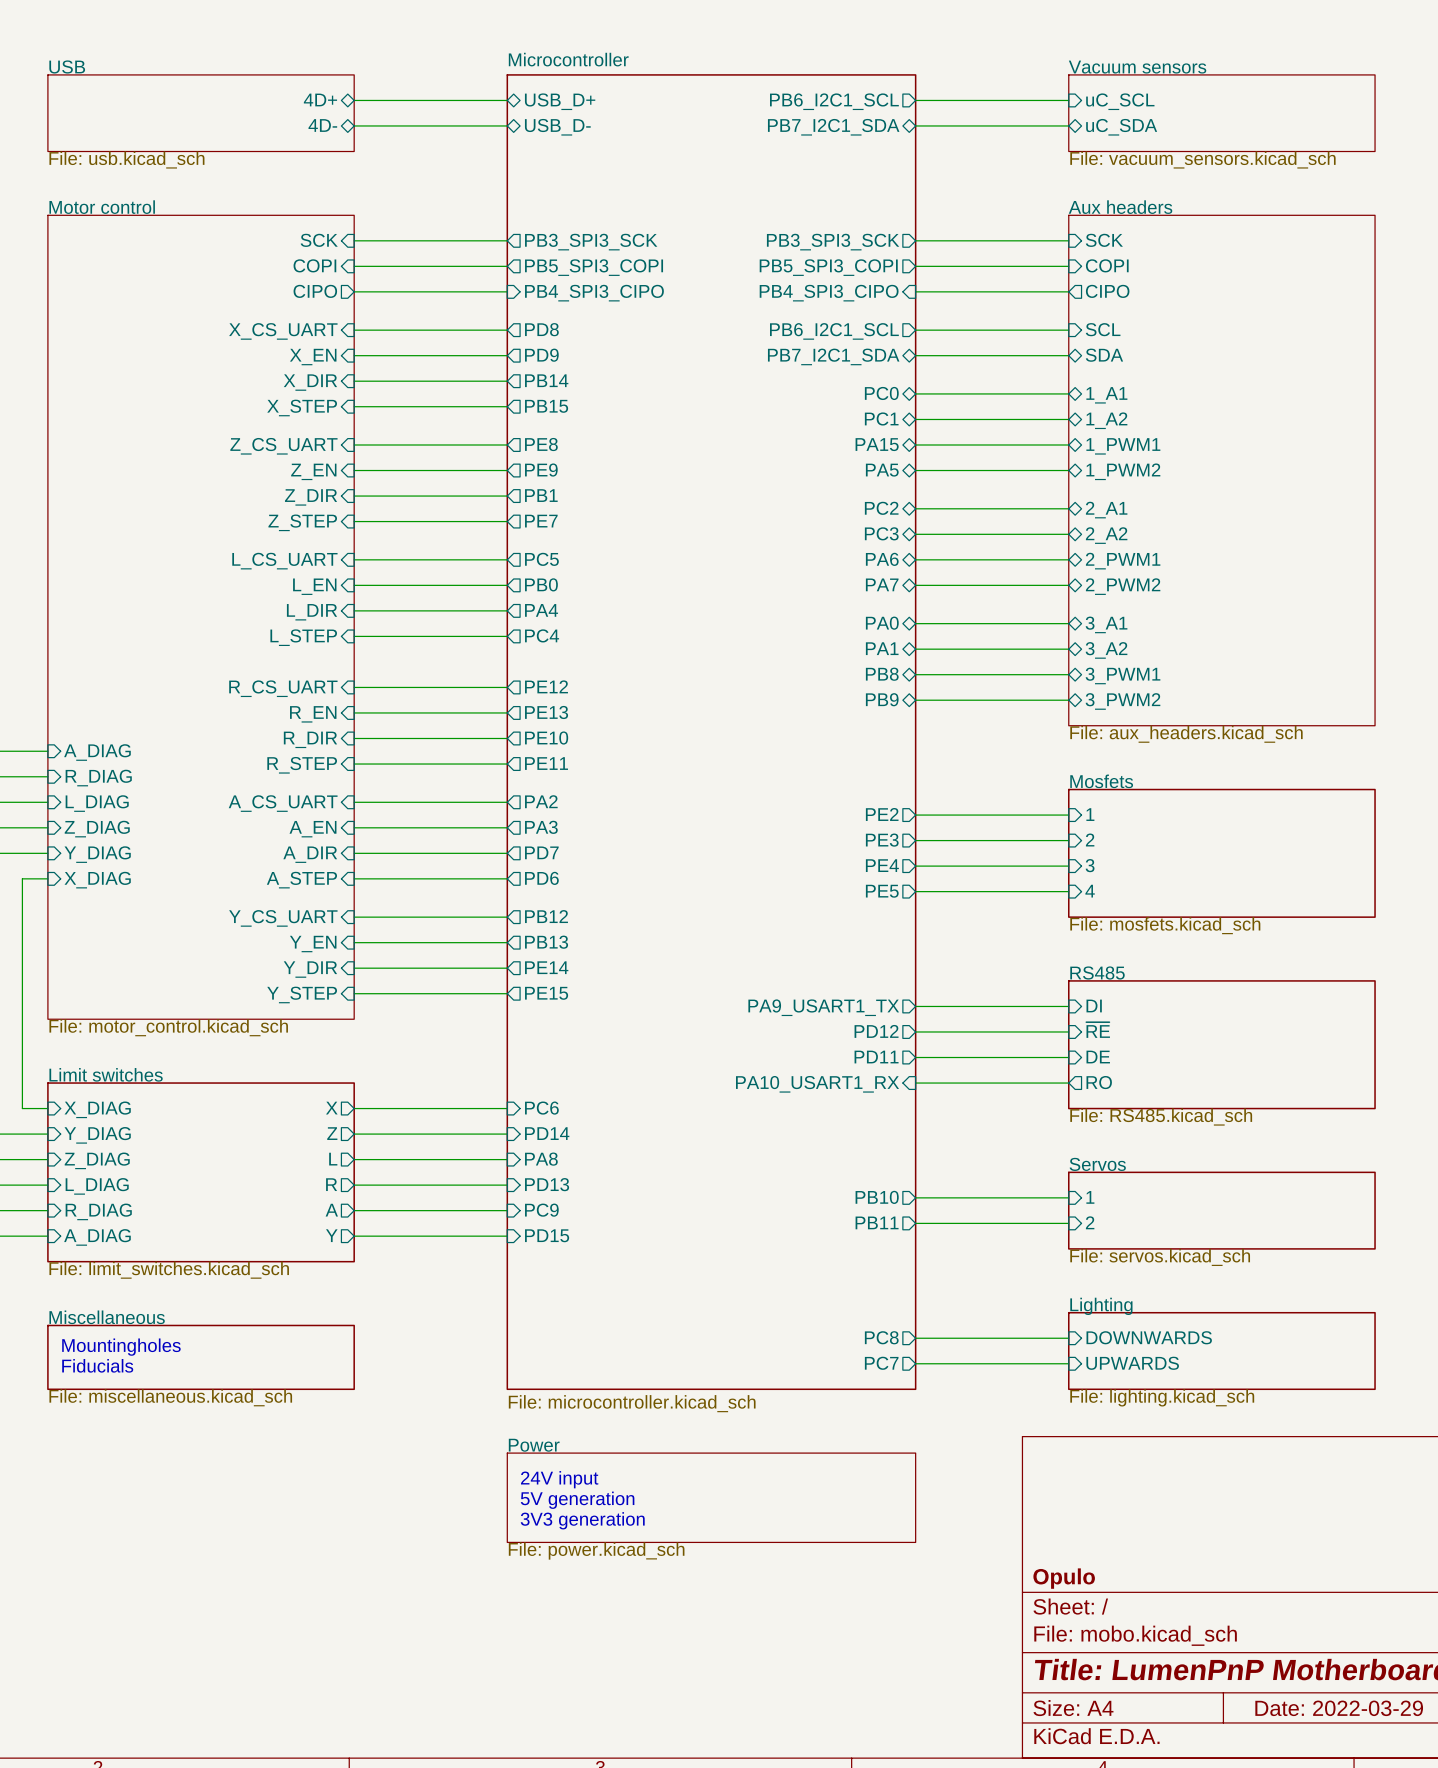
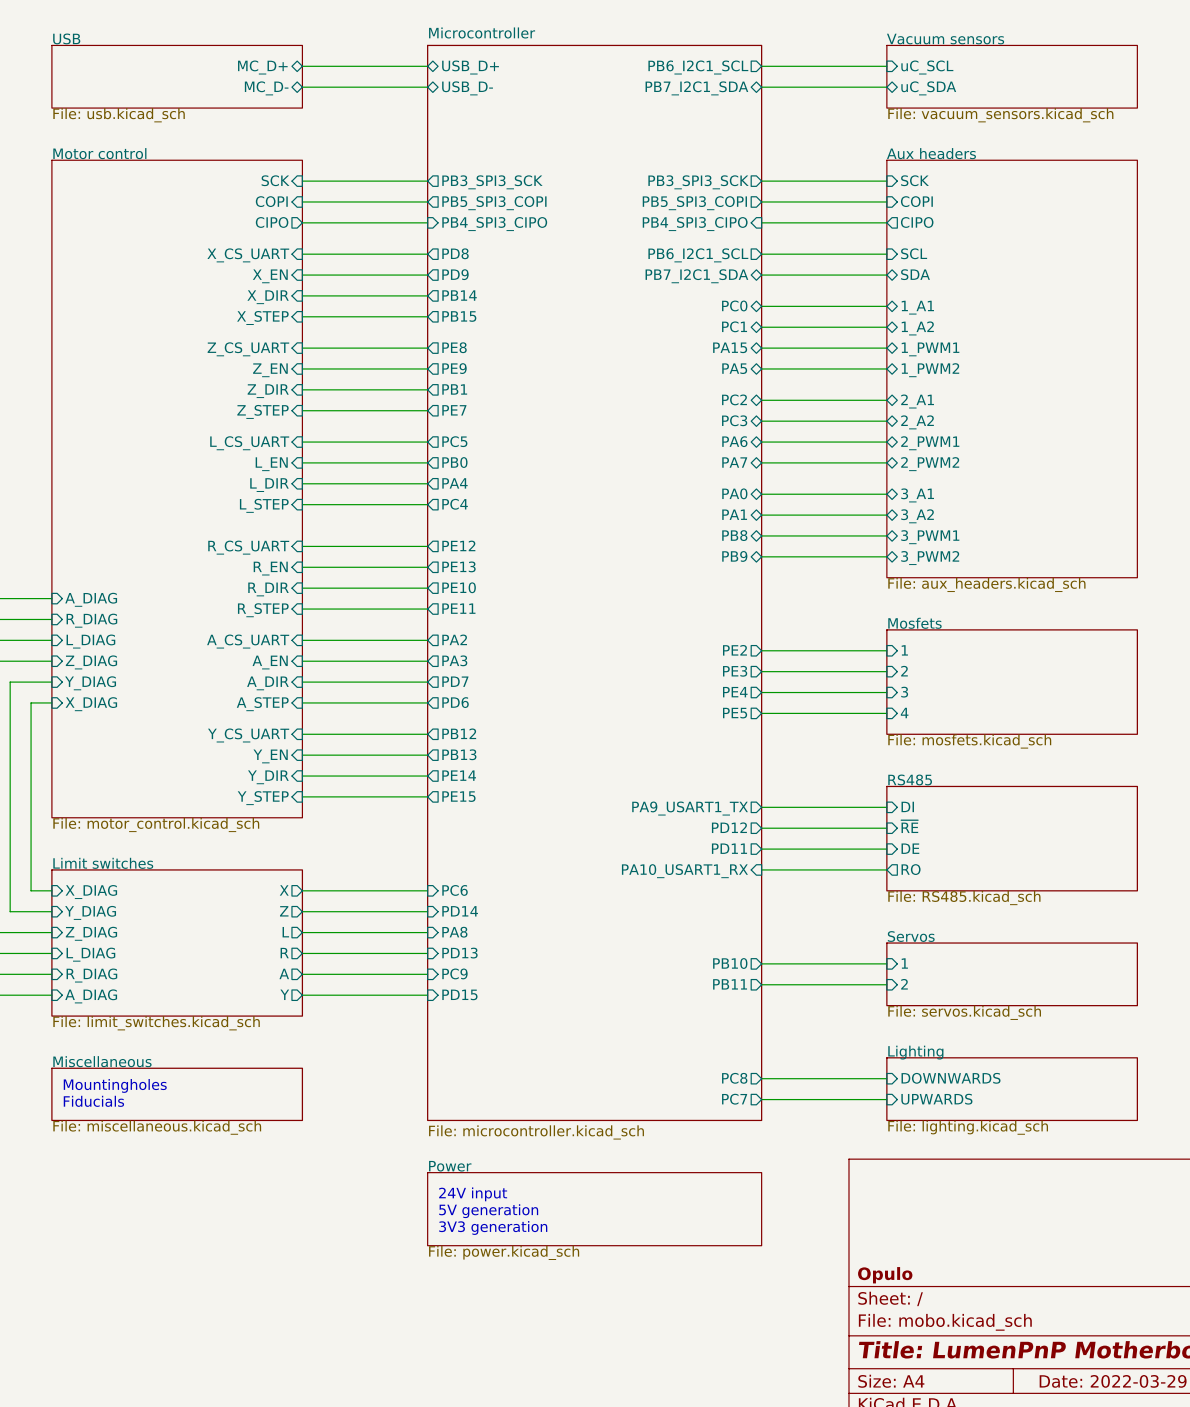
sheet pin: 4D+ (320, 99) -> MC_D+ (262, 67)
sheet pin: 4D- (322, 125) -> MC_D- (266, 88)

